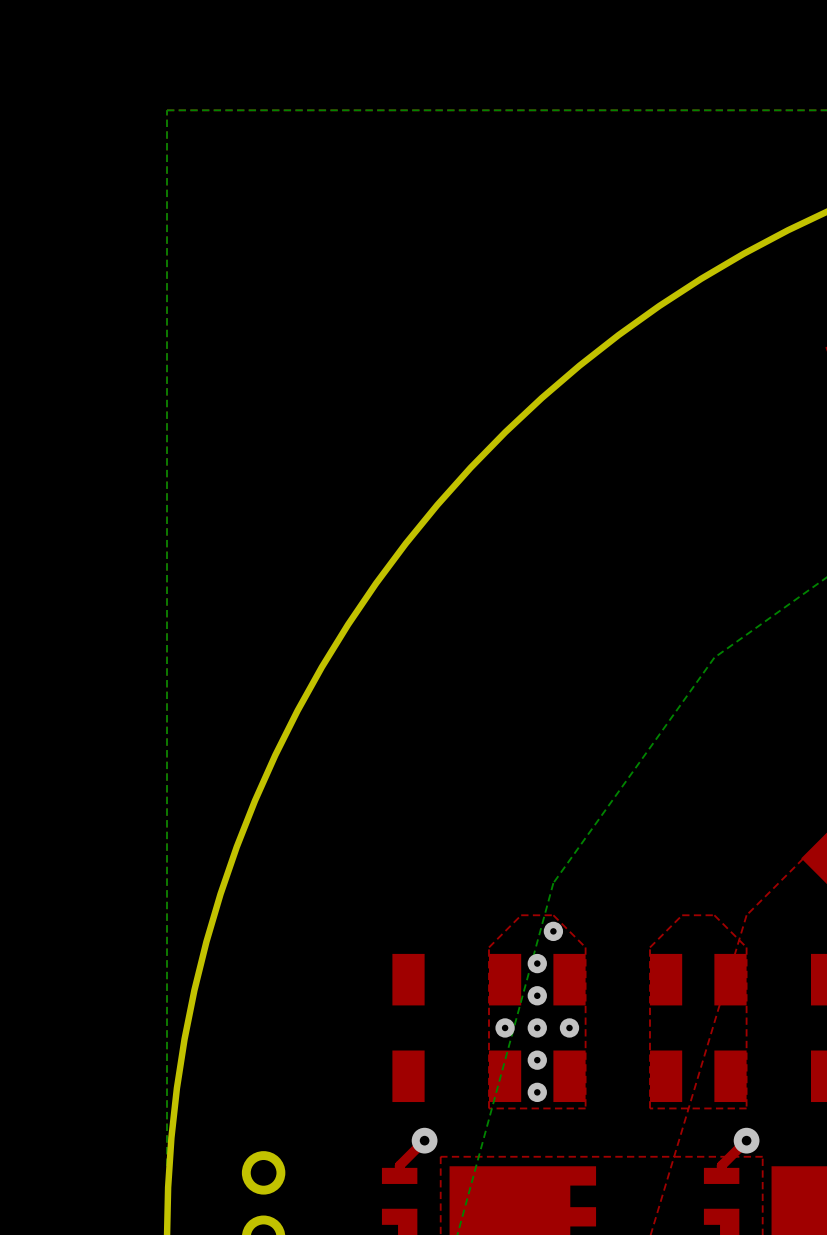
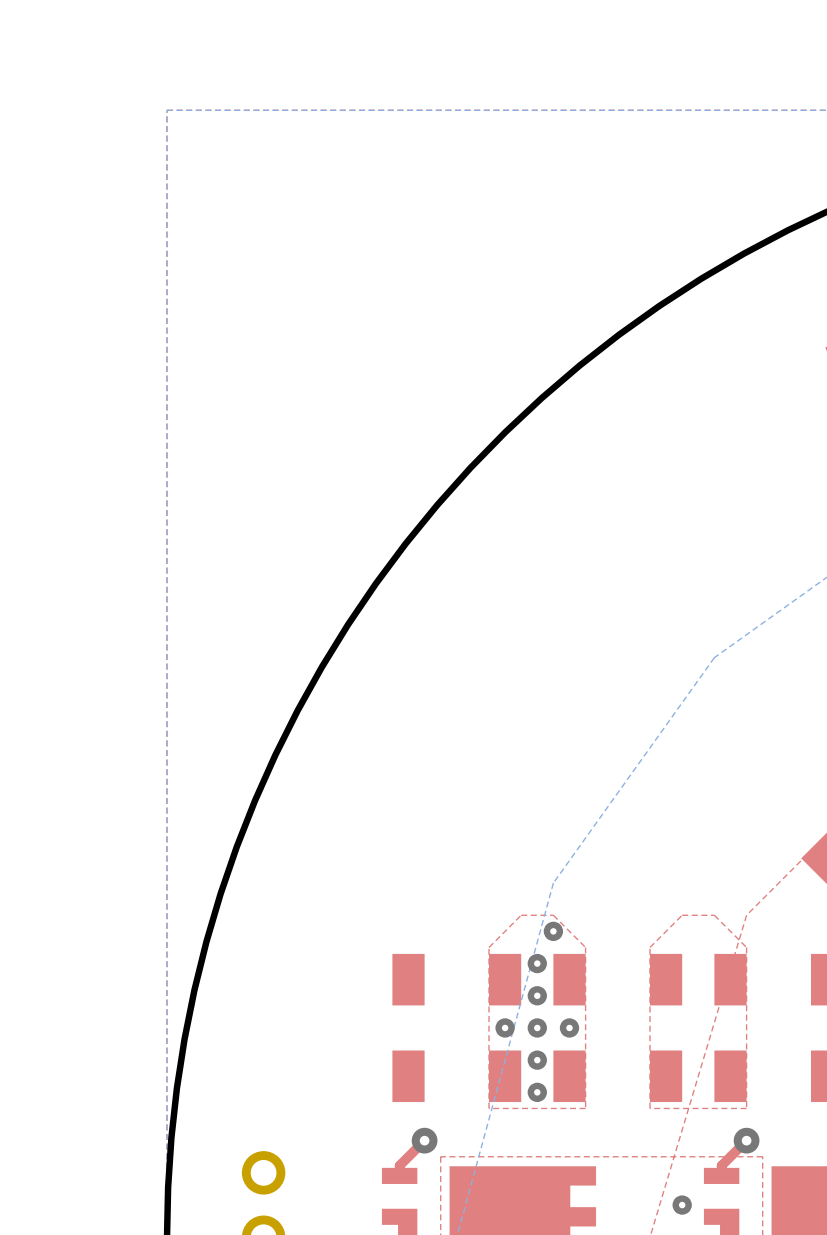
via: none -> (682, 1205)

